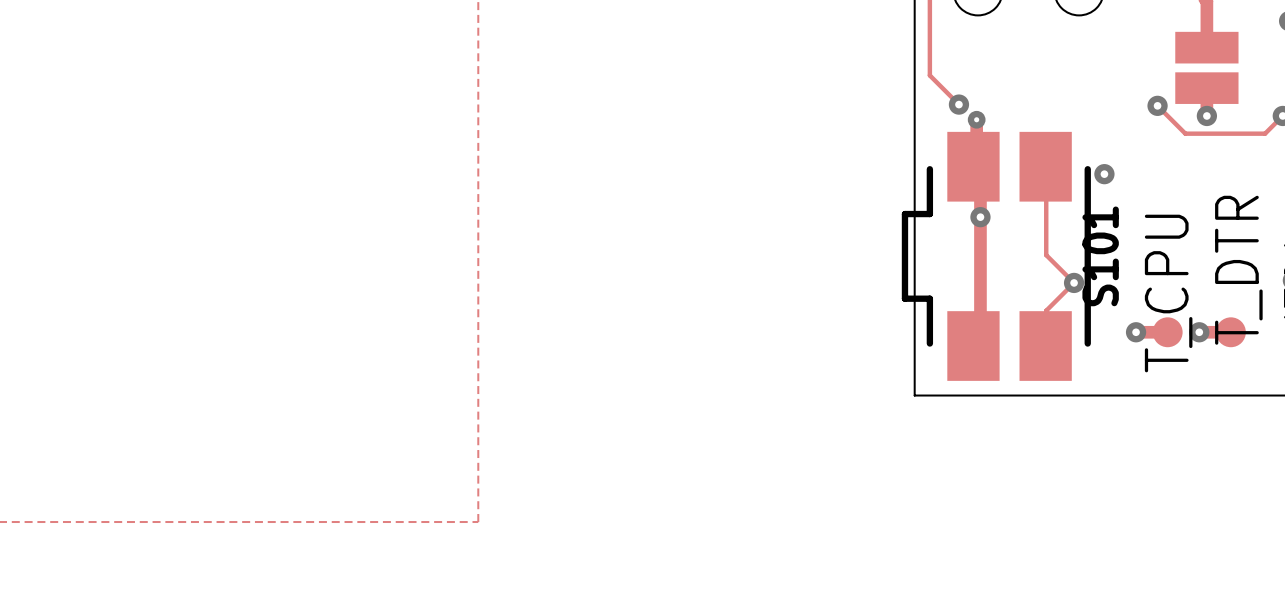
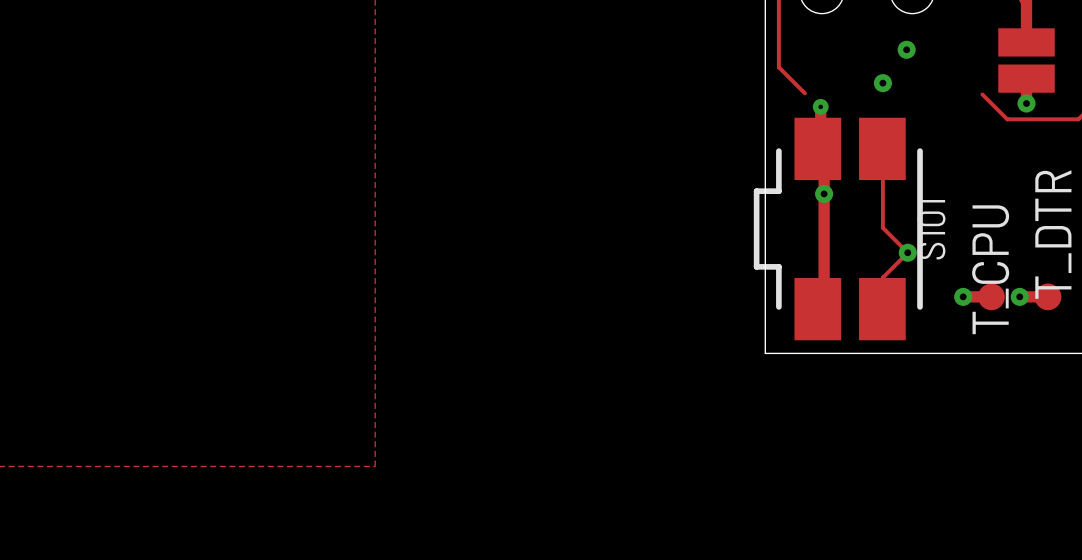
via: none -> (906, 49)
via: none -> (882, 83)
via: (958, 104) -> none
via: (1157, 105) -> none
via: (1104, 174) -> none

